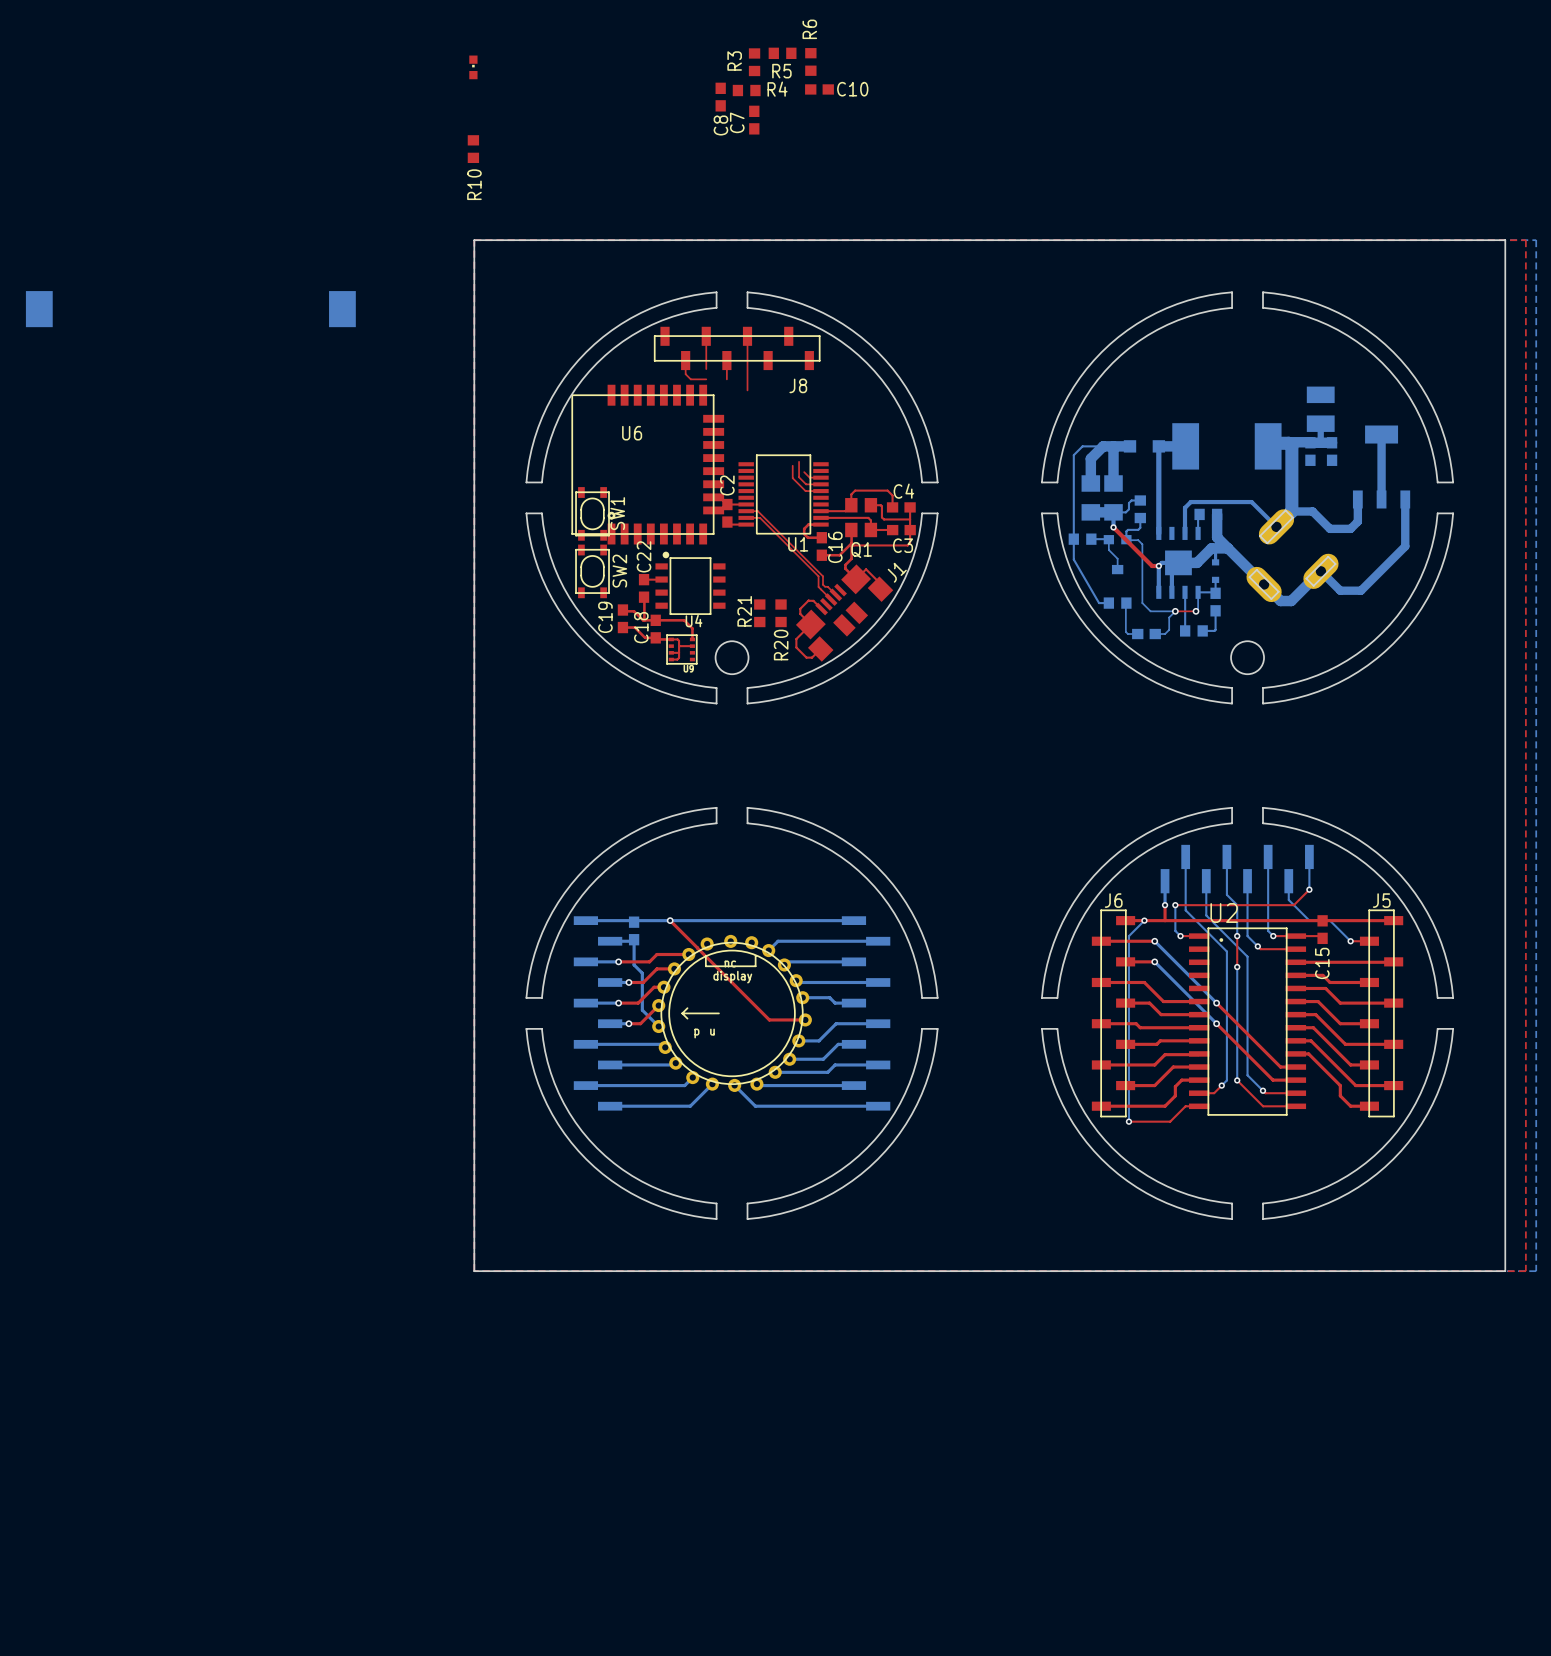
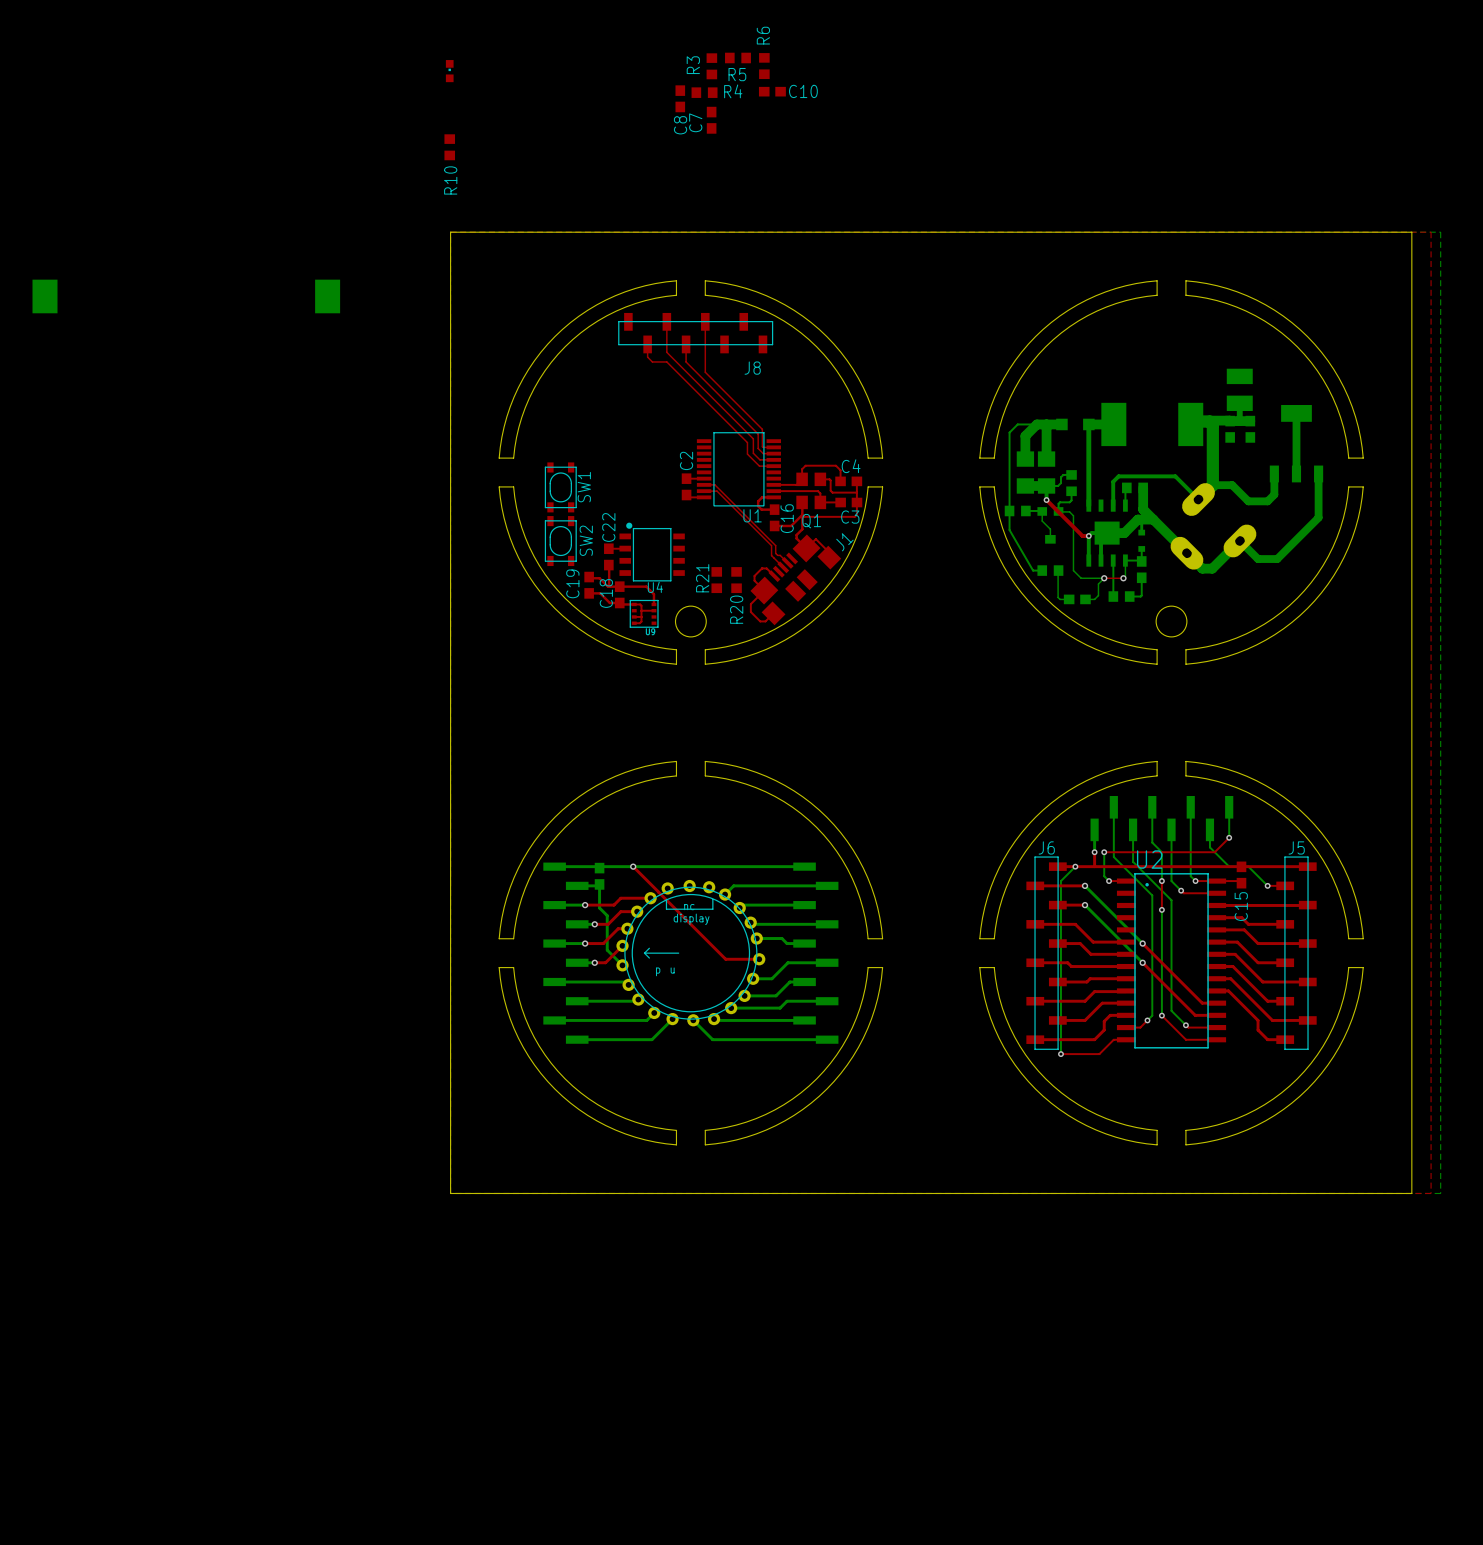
top track: none -> (666, 352) (753, 438)
top track: none -> (666, 361) (747, 442)
top track: none -> (686, 361) (758, 434) (758, 448)
top track: none -> (705, 372) (762, 429) (762, 446) (773, 447)
U6: (647, 464) -> none

